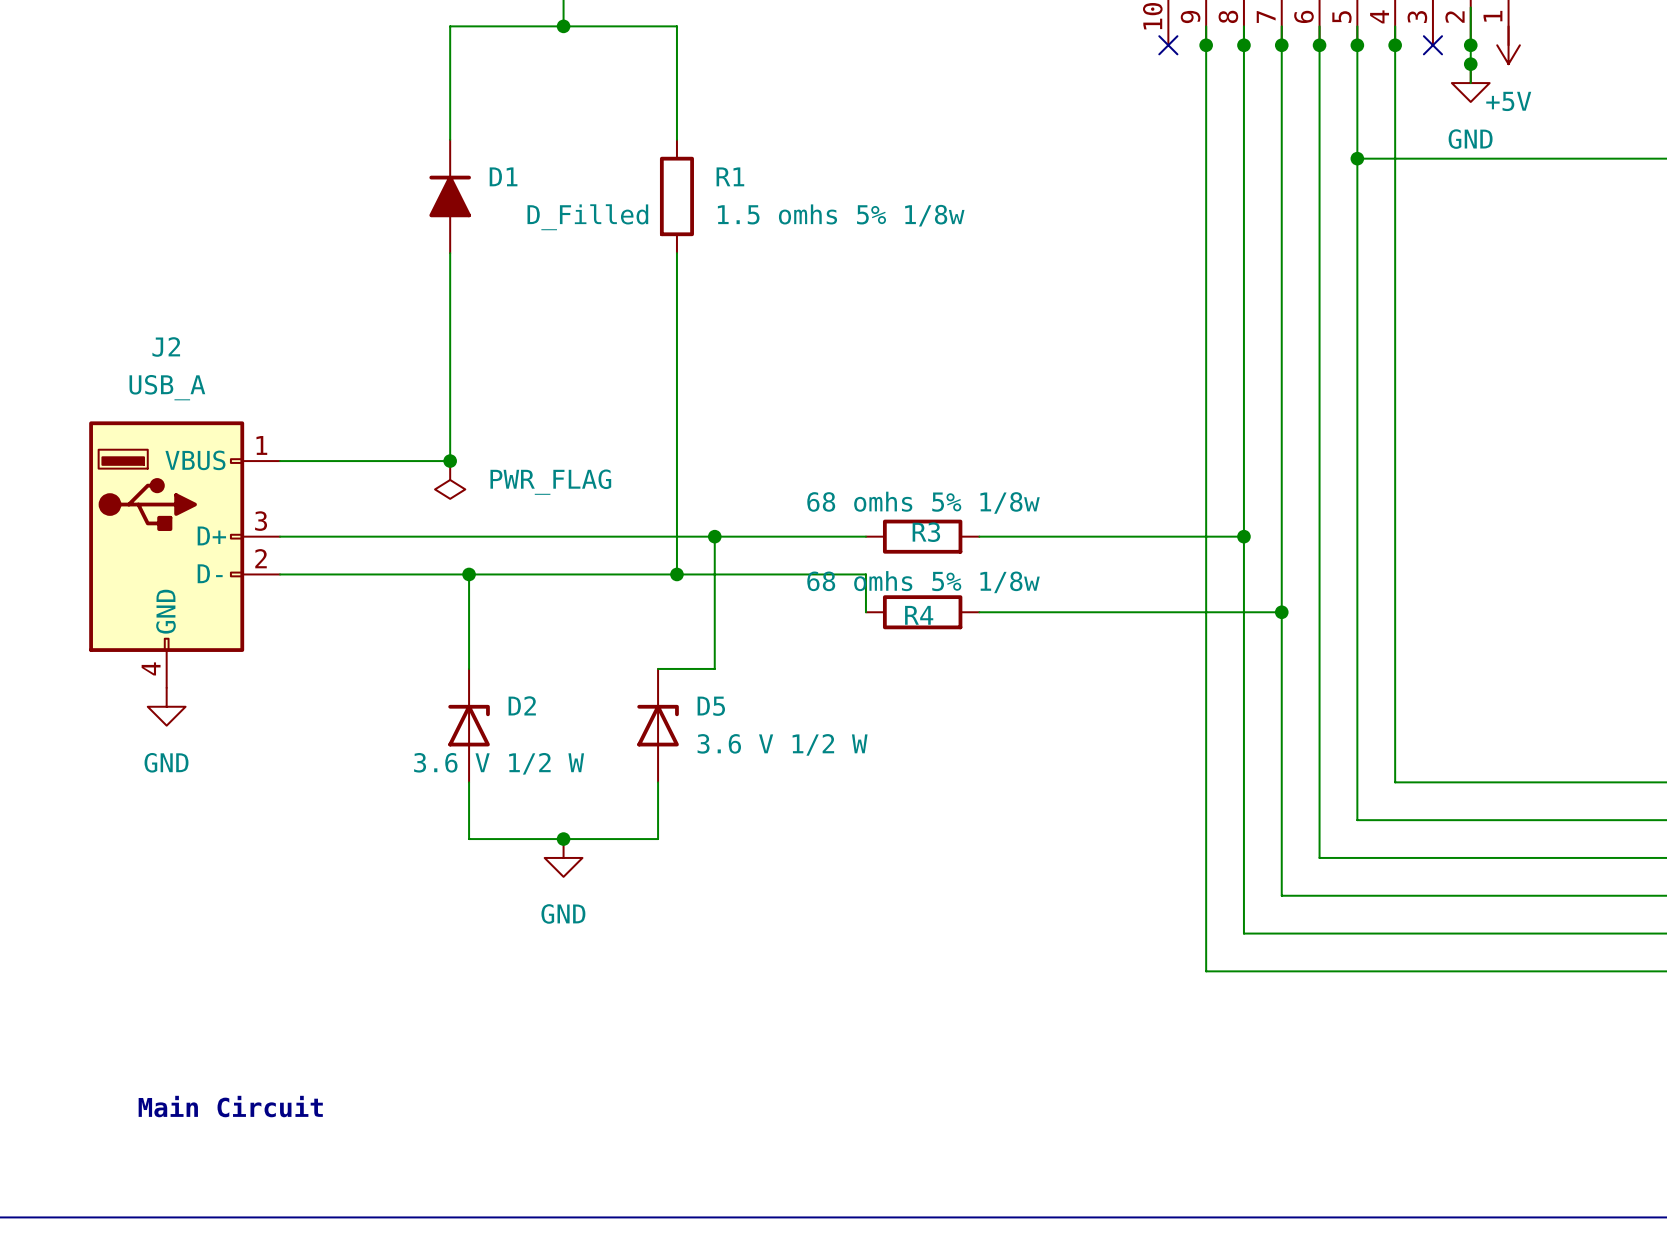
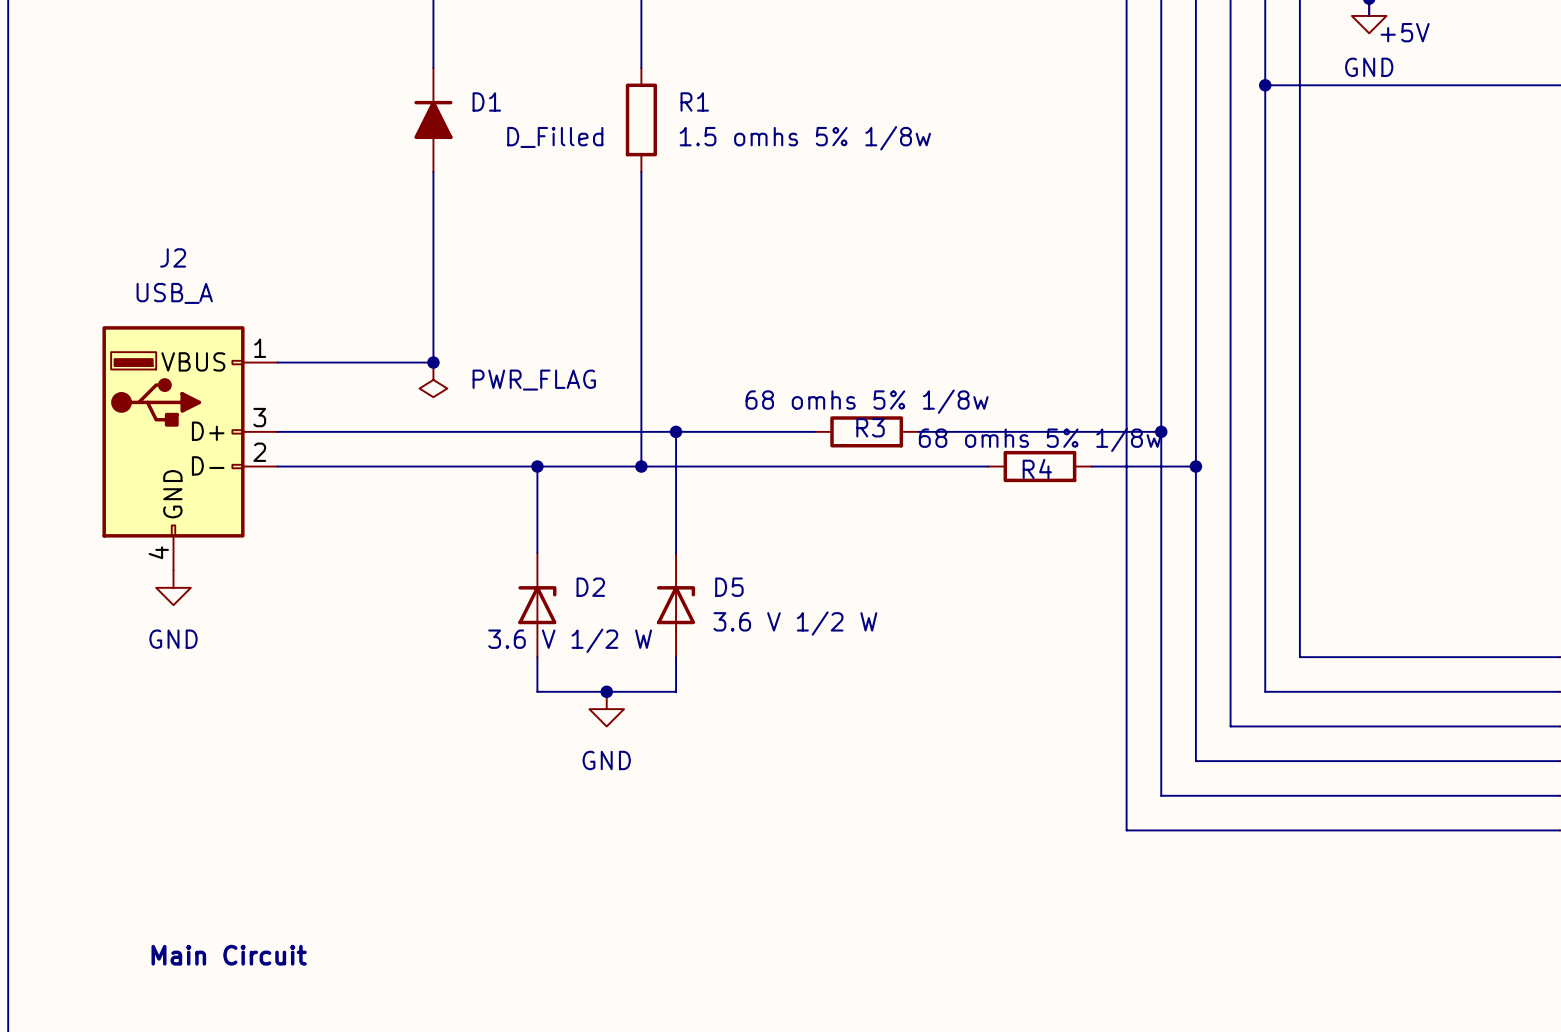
wire: (469, 574) (469, 668) -> (537, 466) (537, 553)
junction: (469, 574) -> none
junction: none -> (537, 466)
wire: (865, 574) (865, 612) -> (814, 466) (987, 466)
wire: none -> (1091, 466) (1195, 466)
R4 position: (922, 612) -> (1039, 466)
wire: (979, 612) (1281, 612) -> none
junction position: (1281, 612) -> (1195, 466)
wire: (658, 668) (714, 668) -> none
D2 position: (469, 725) -> (537, 605)
D5 position: (658, 725) -> (676, 605)
wire: (469, 782) (469, 839) (658, 839) (658, 782) -> none
wire: none -> (537, 657) (537, 691) (676, 691) (676, 657)
junction position: (563, 839) -> (606, 691)
power symbol position: GND (563, 857) -> GND (606, 709)

